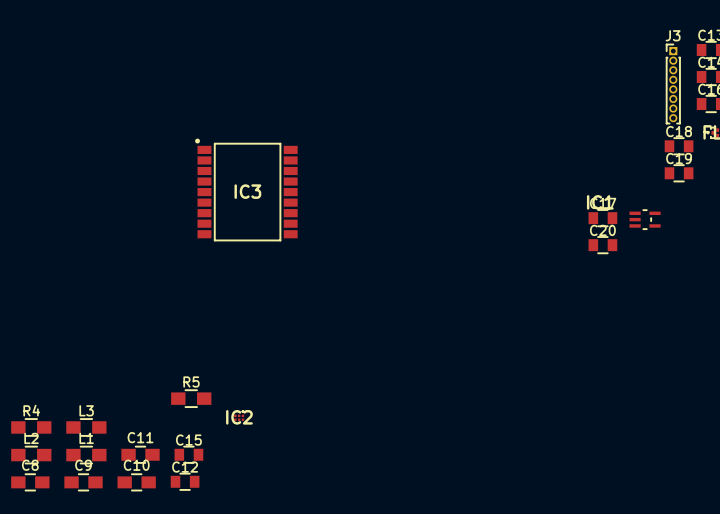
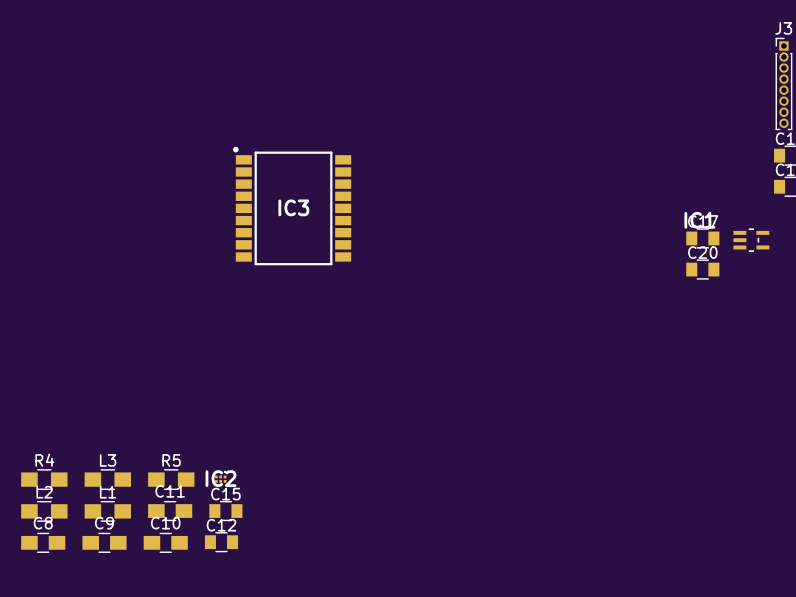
R5 position: (191, 398) -> (171, 479)
IC2 position: (239, 415) -> (220, 476)

